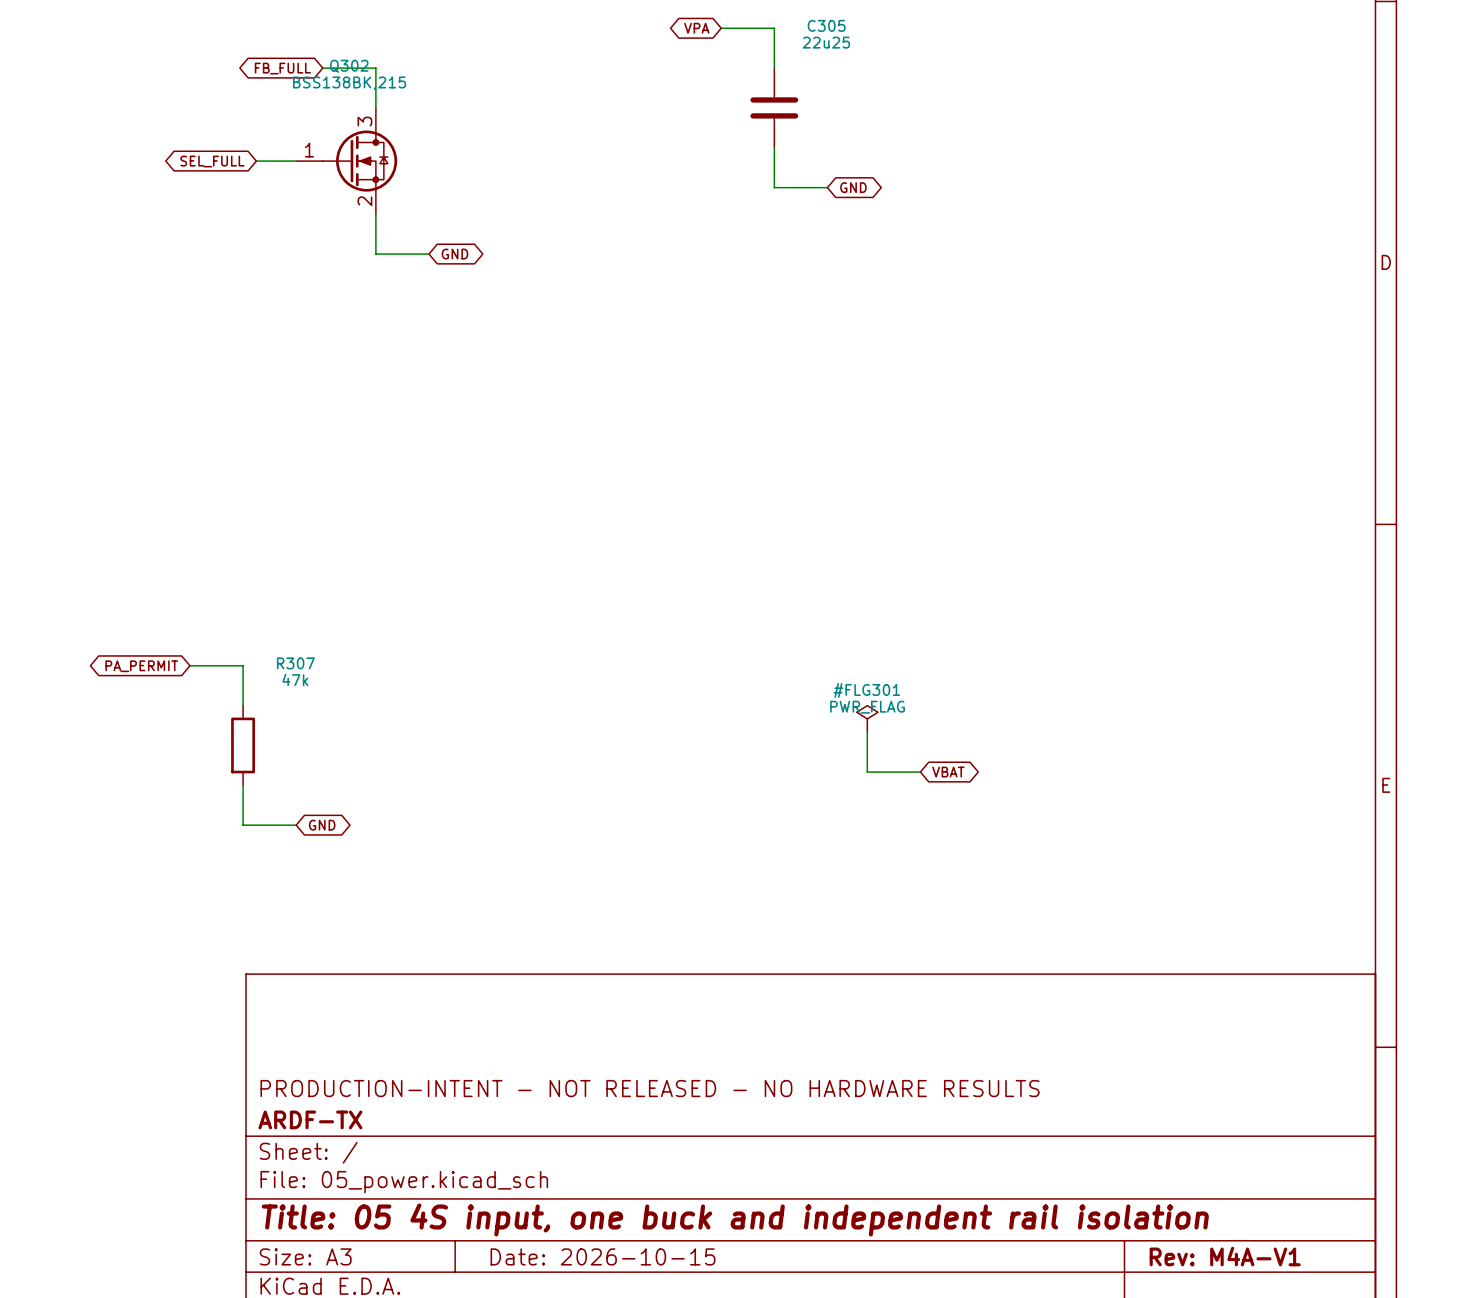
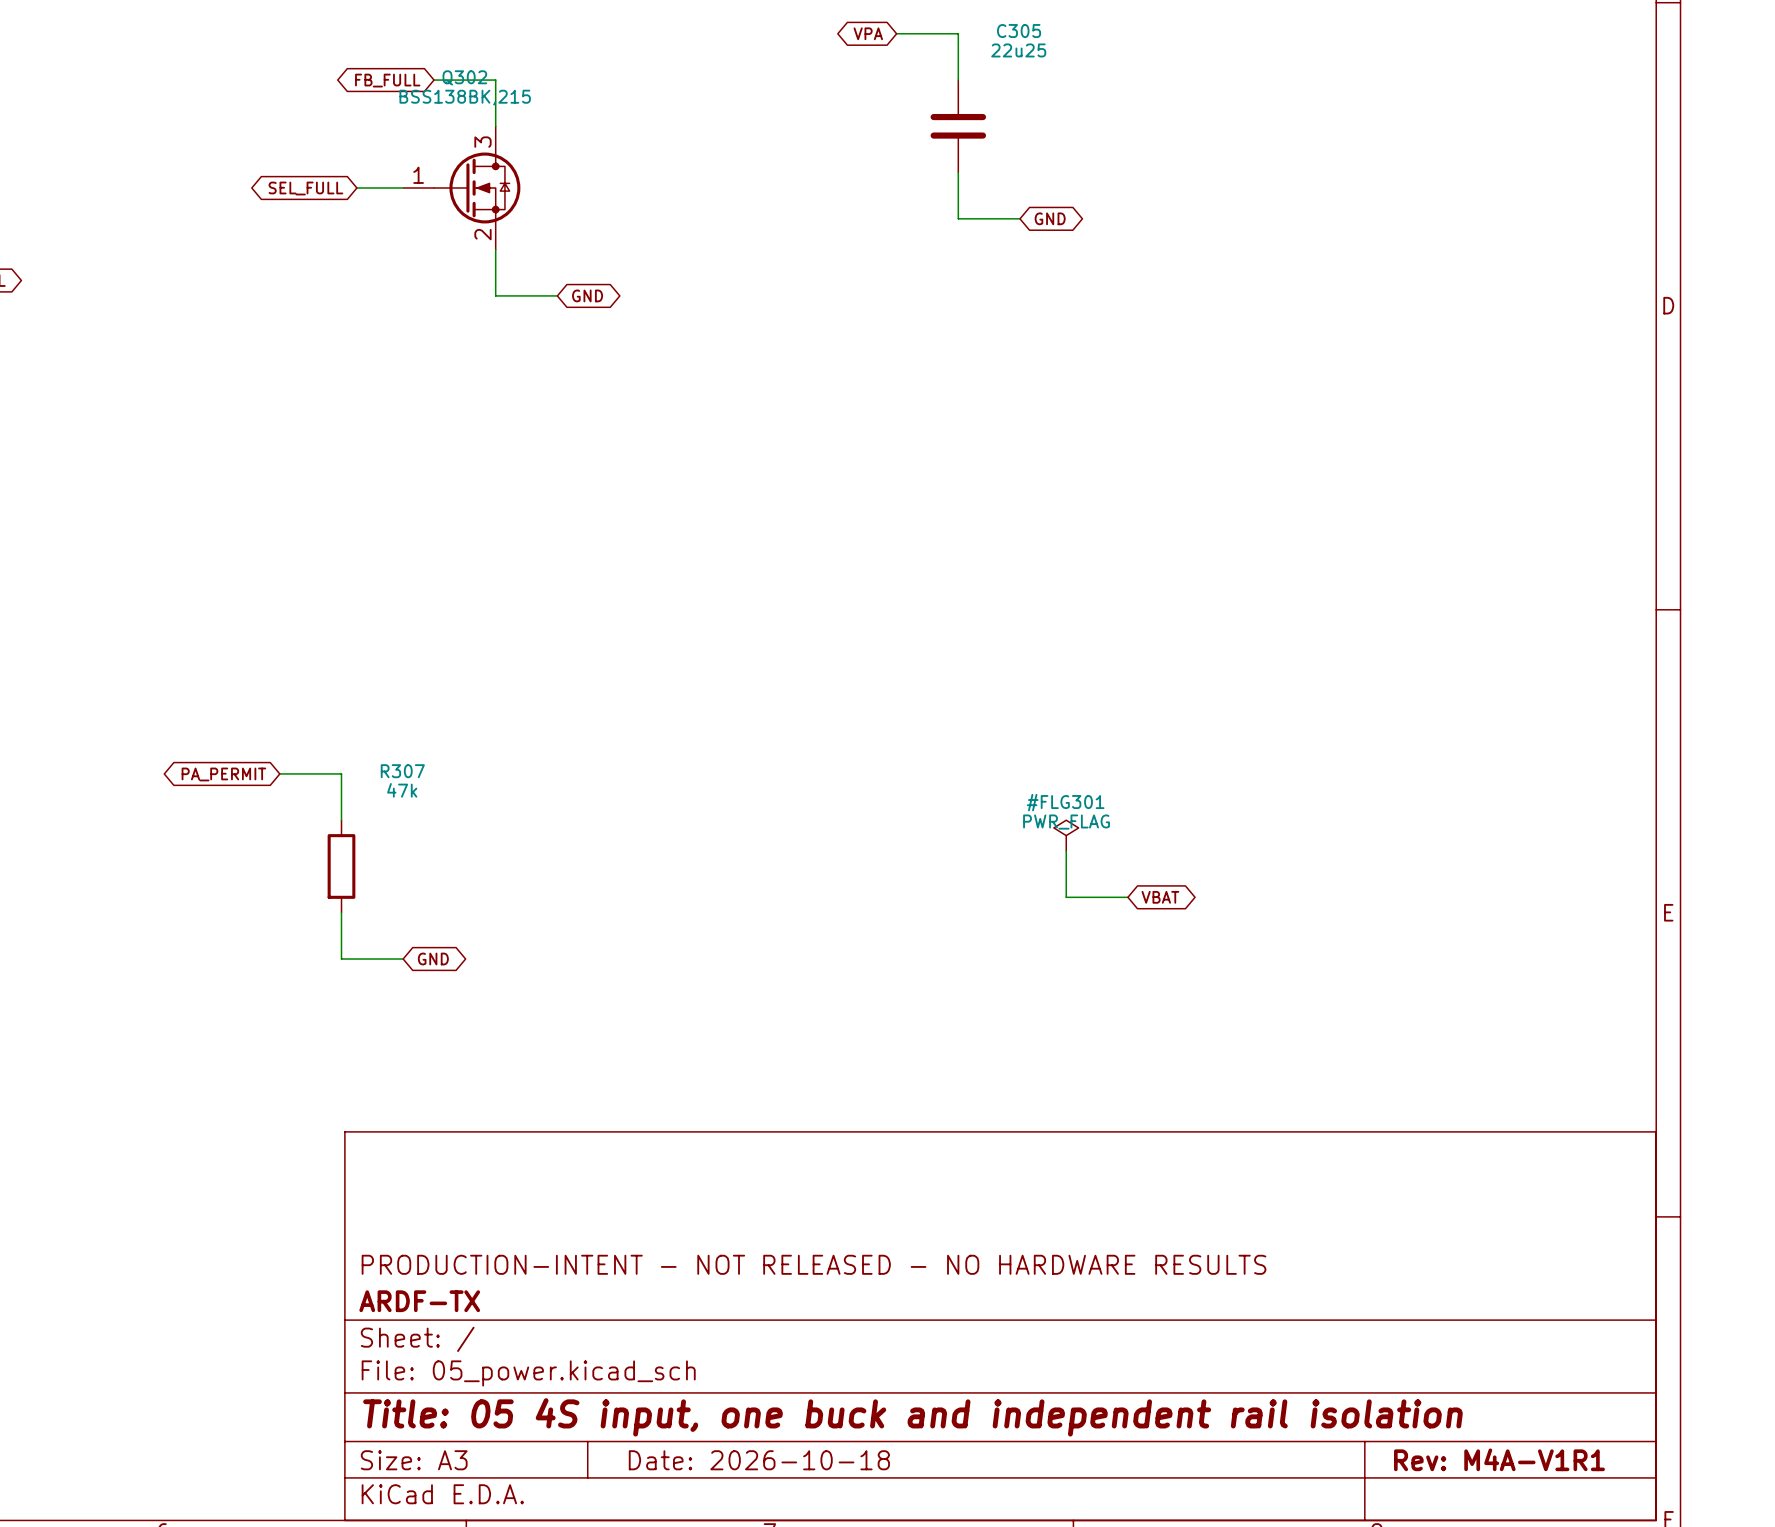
title block: Date: 2026-10-15 (603, 1256) -> Date: 2026-10-18 (759, 1460)
title block: Rev: M4A-V1 (1225, 1256) -> Rev: M4A-V1R1 (1499, 1459)

